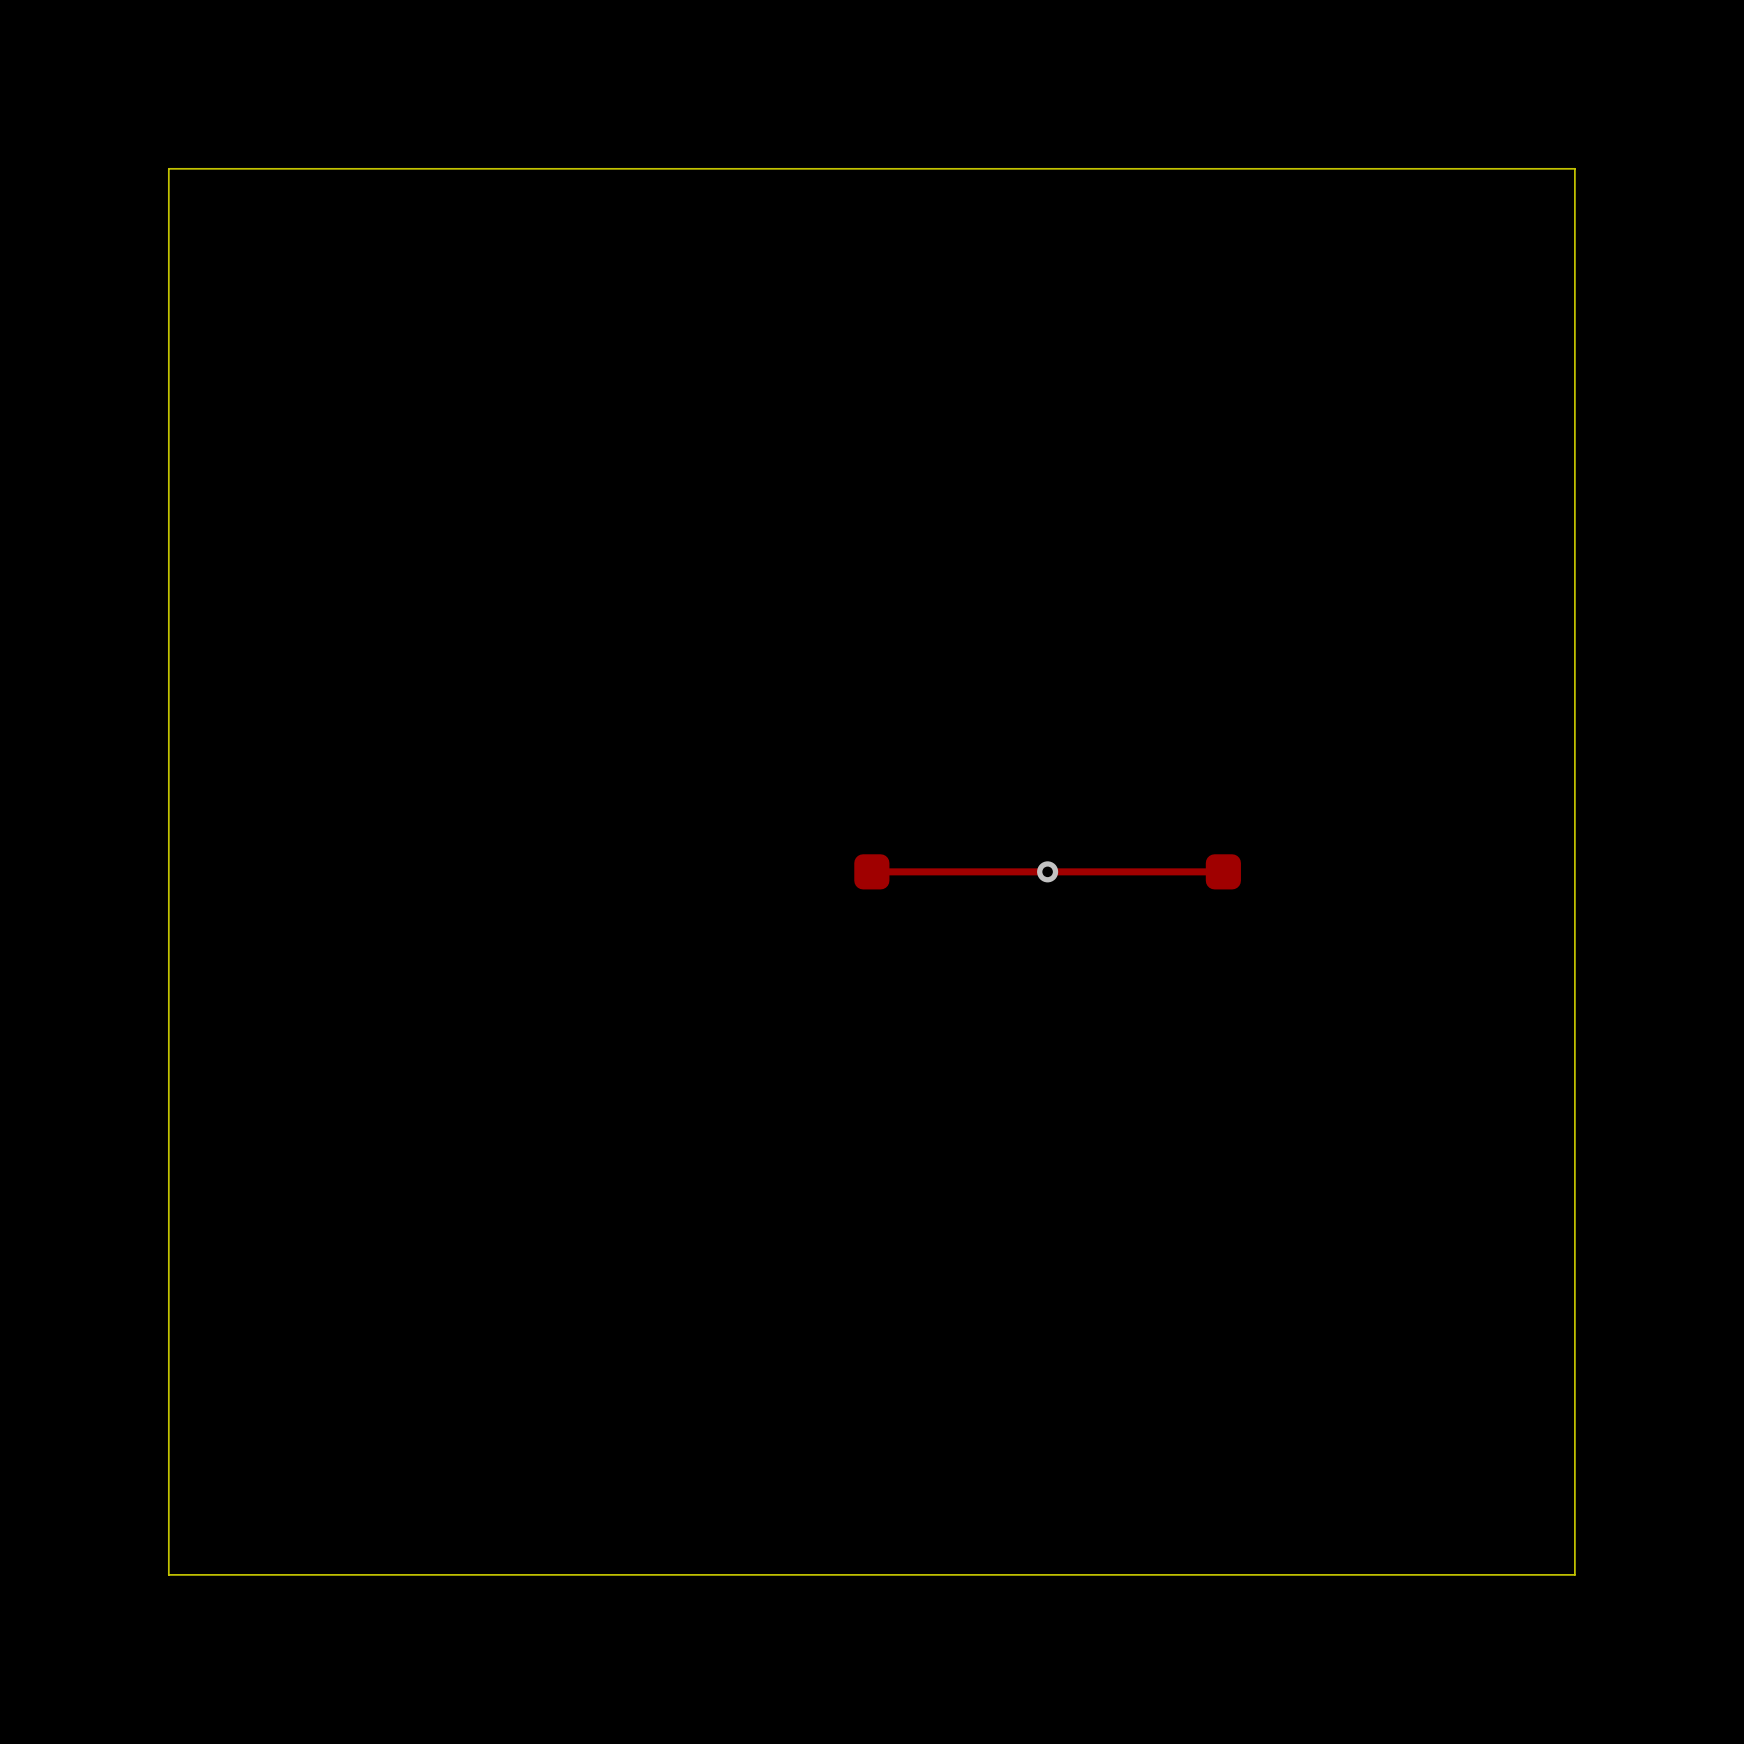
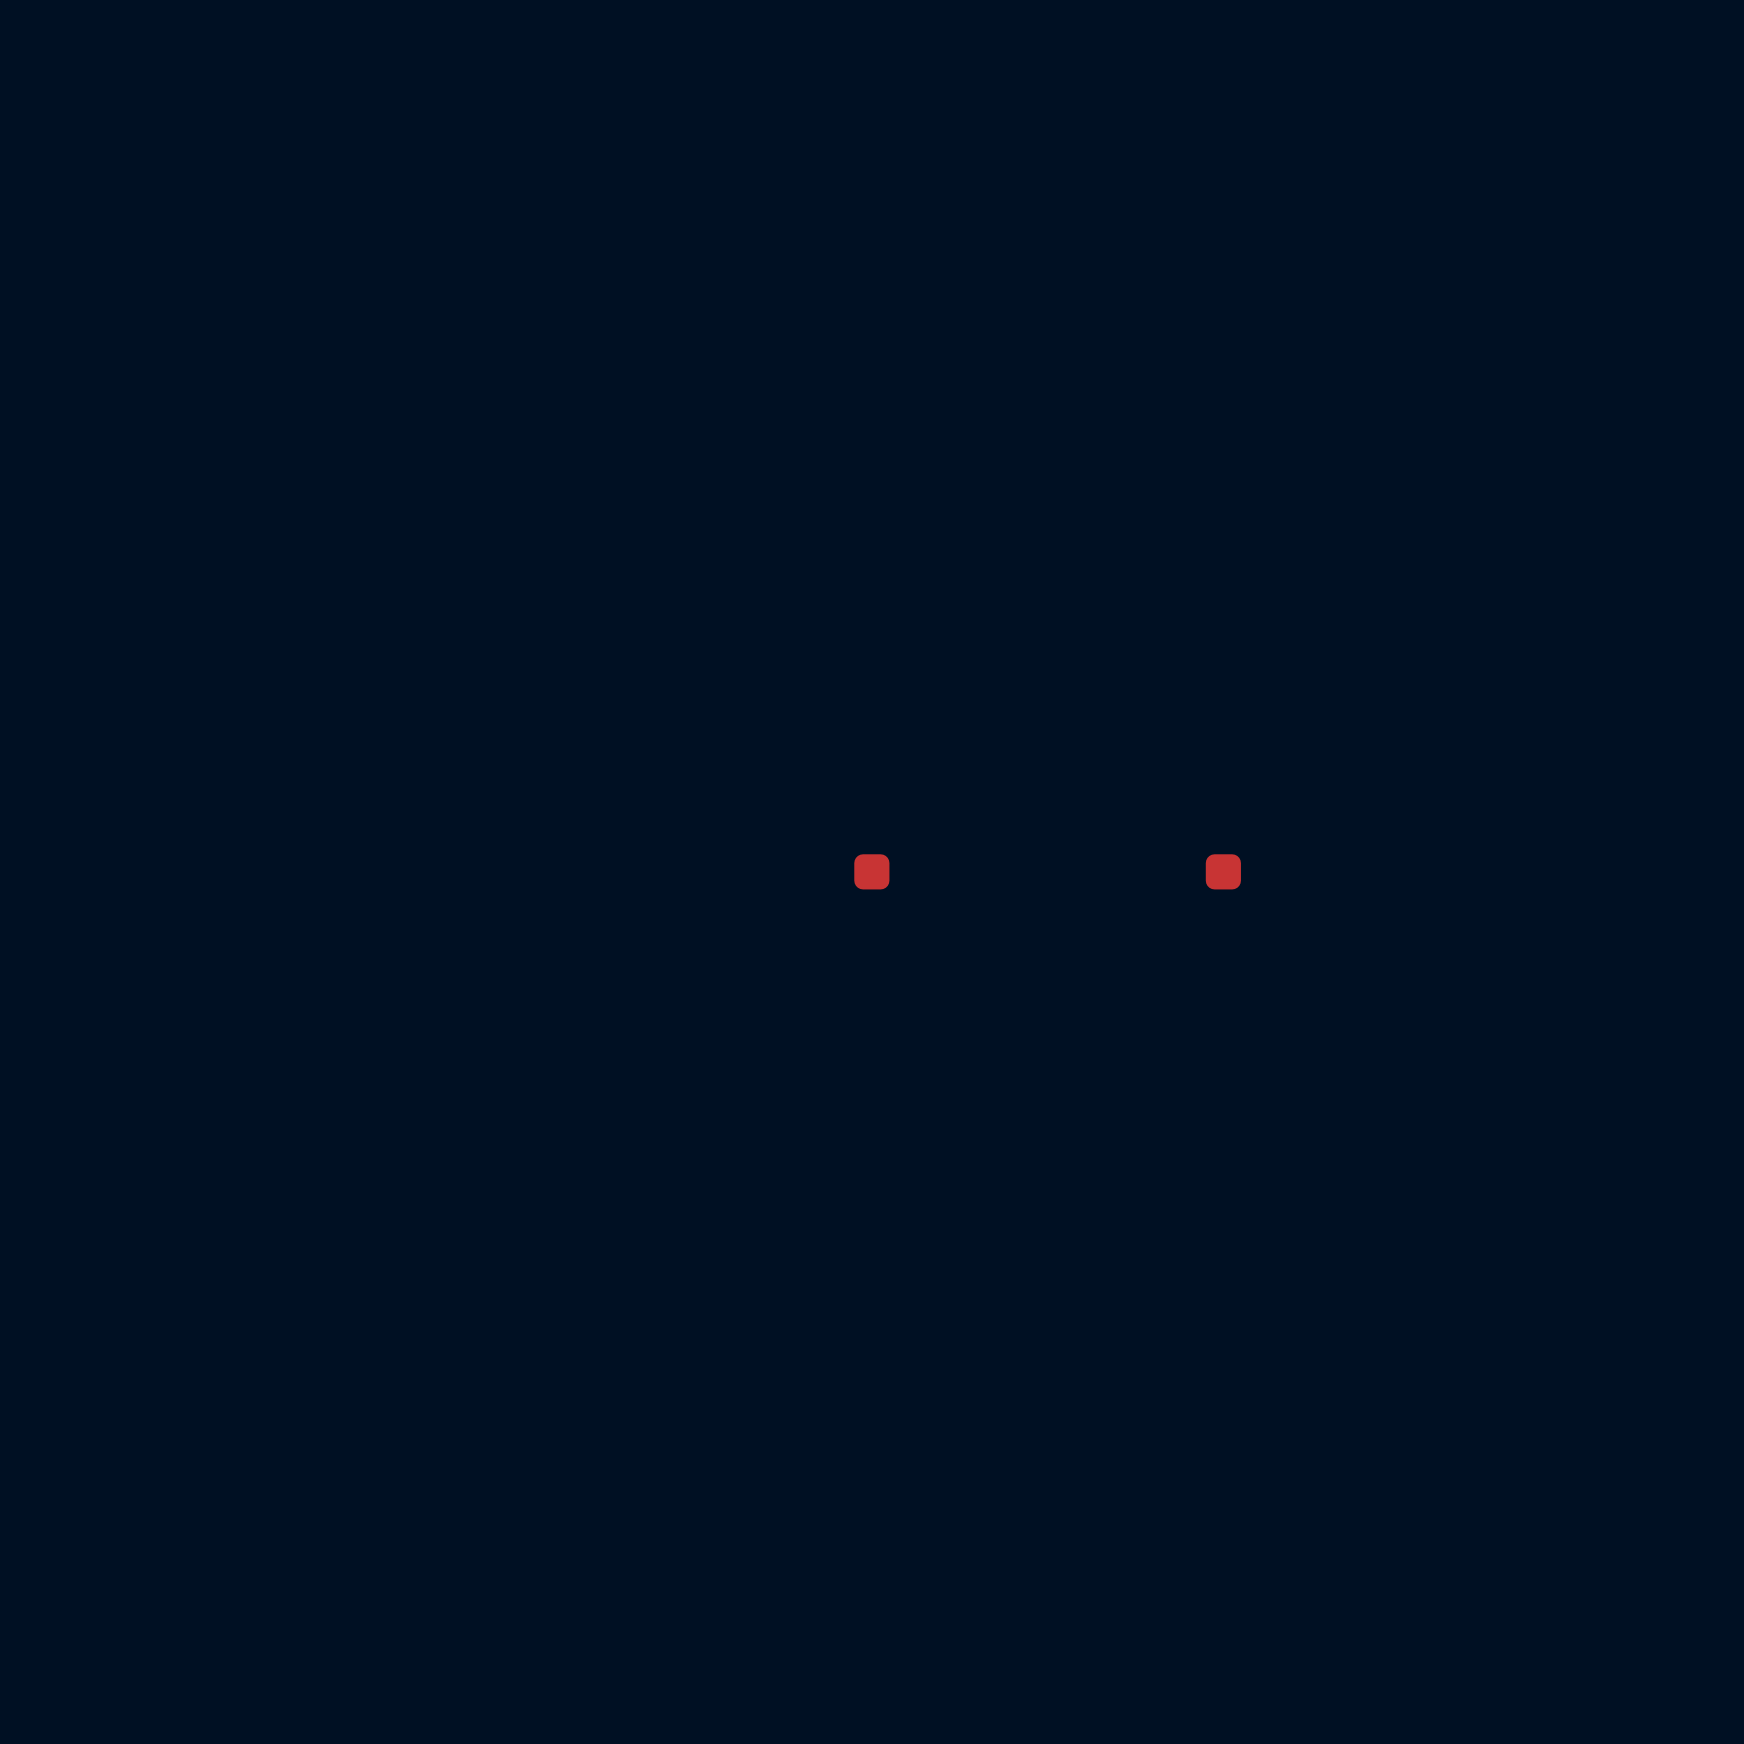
board edge: (1574, 168) (168, 168) (168, 1574) (1574, 1574) (1574, 168) -> none
via: (1047, 871) -> none
top track: (1223, 871) (871, 871) -> none

